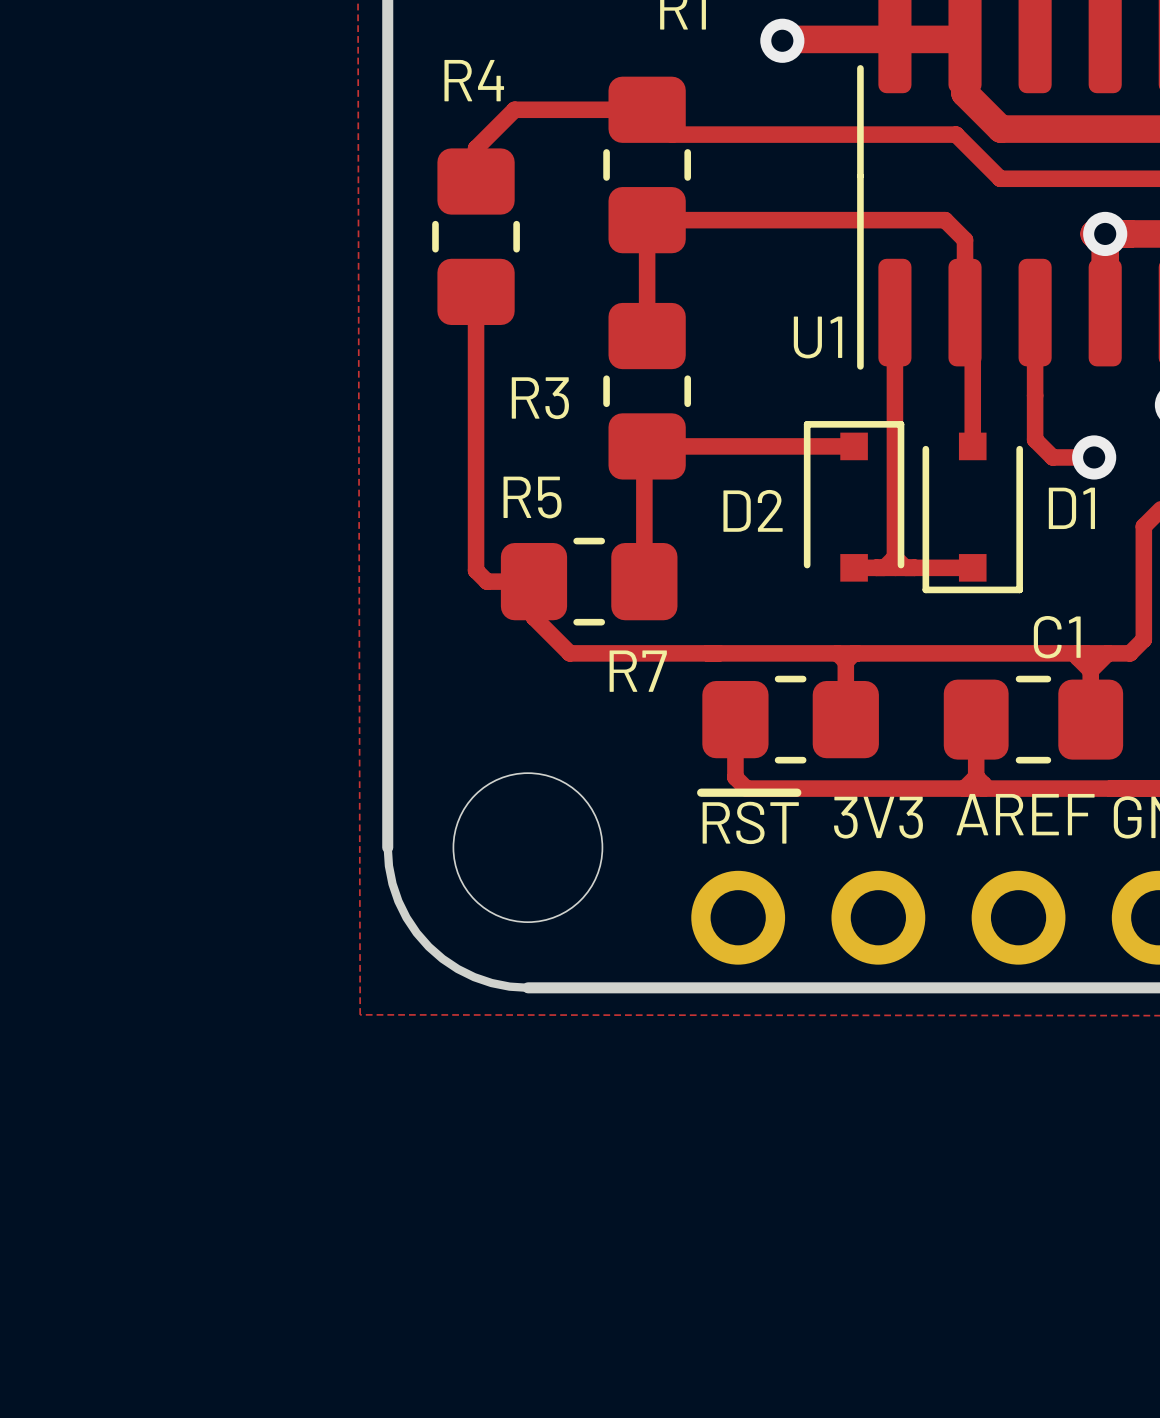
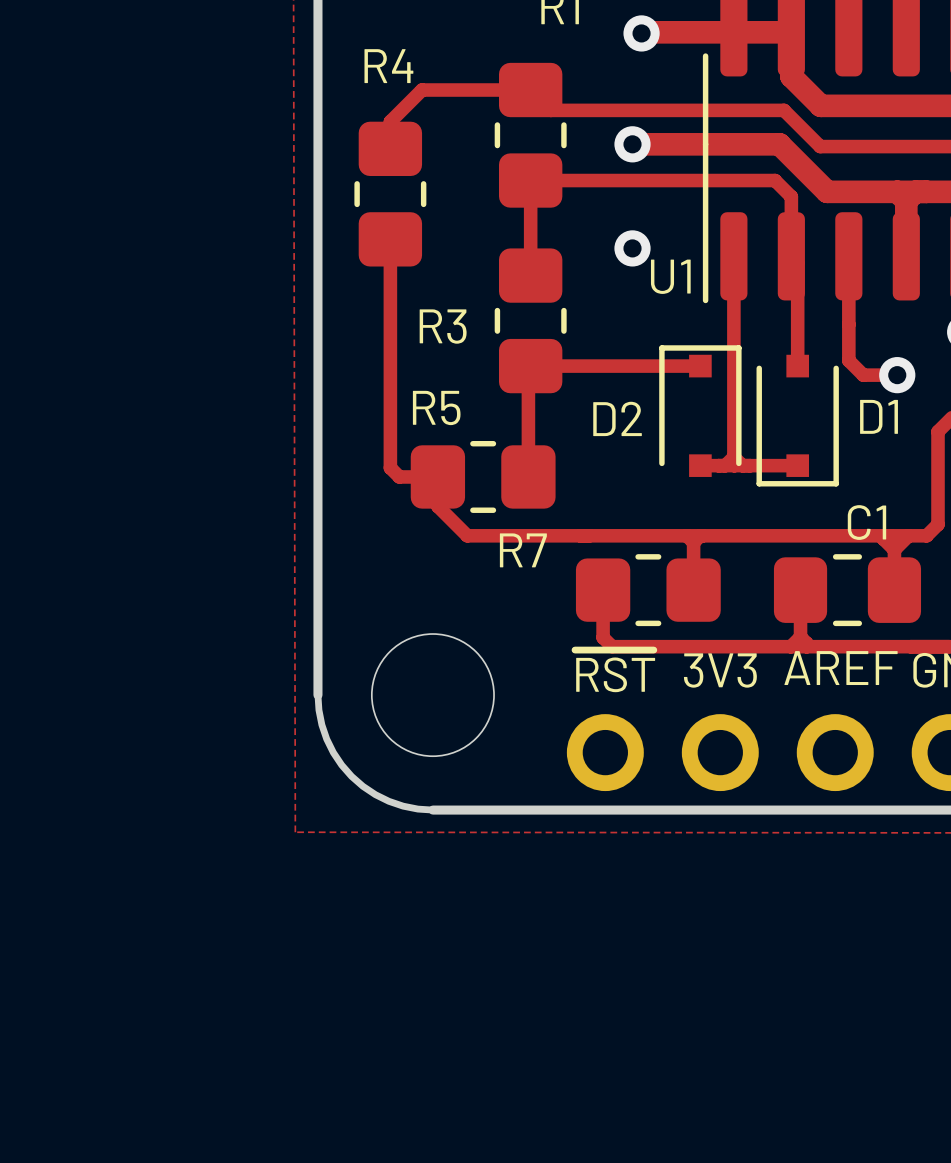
track: none -> (632, 144) (779, 144) (827, 191) (897, 191)
via: none -> (632, 144)
via: (1105, 233) -> none
via: none -> (632, 248)

